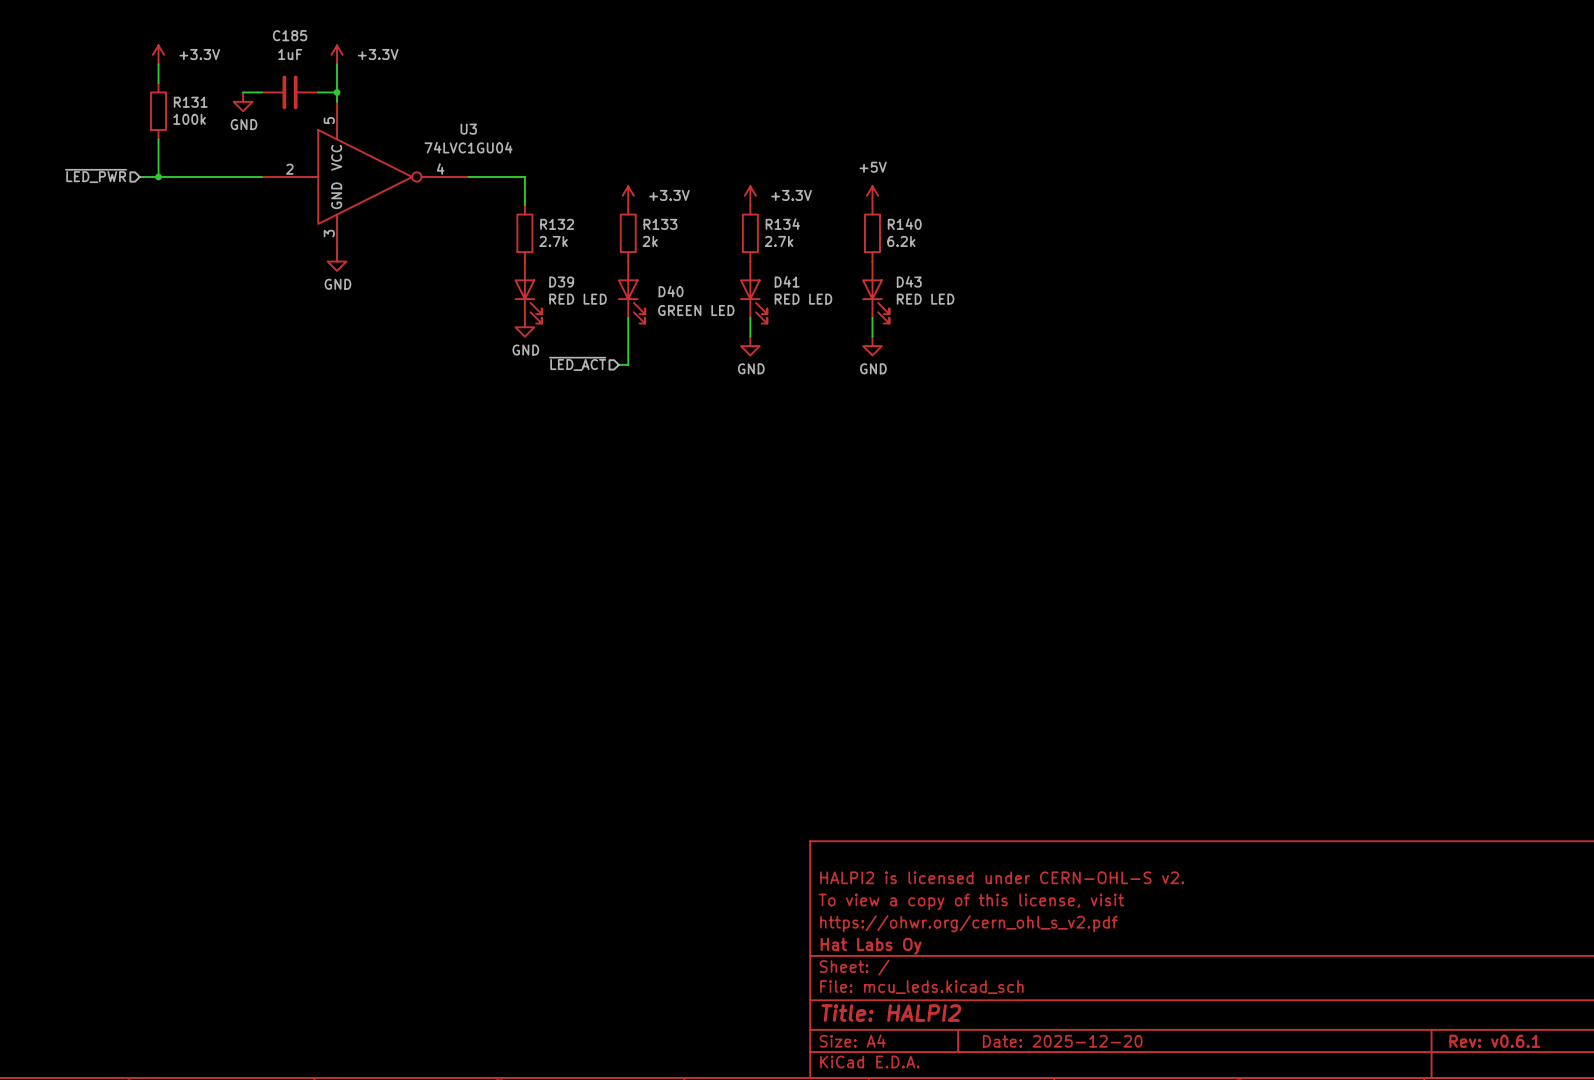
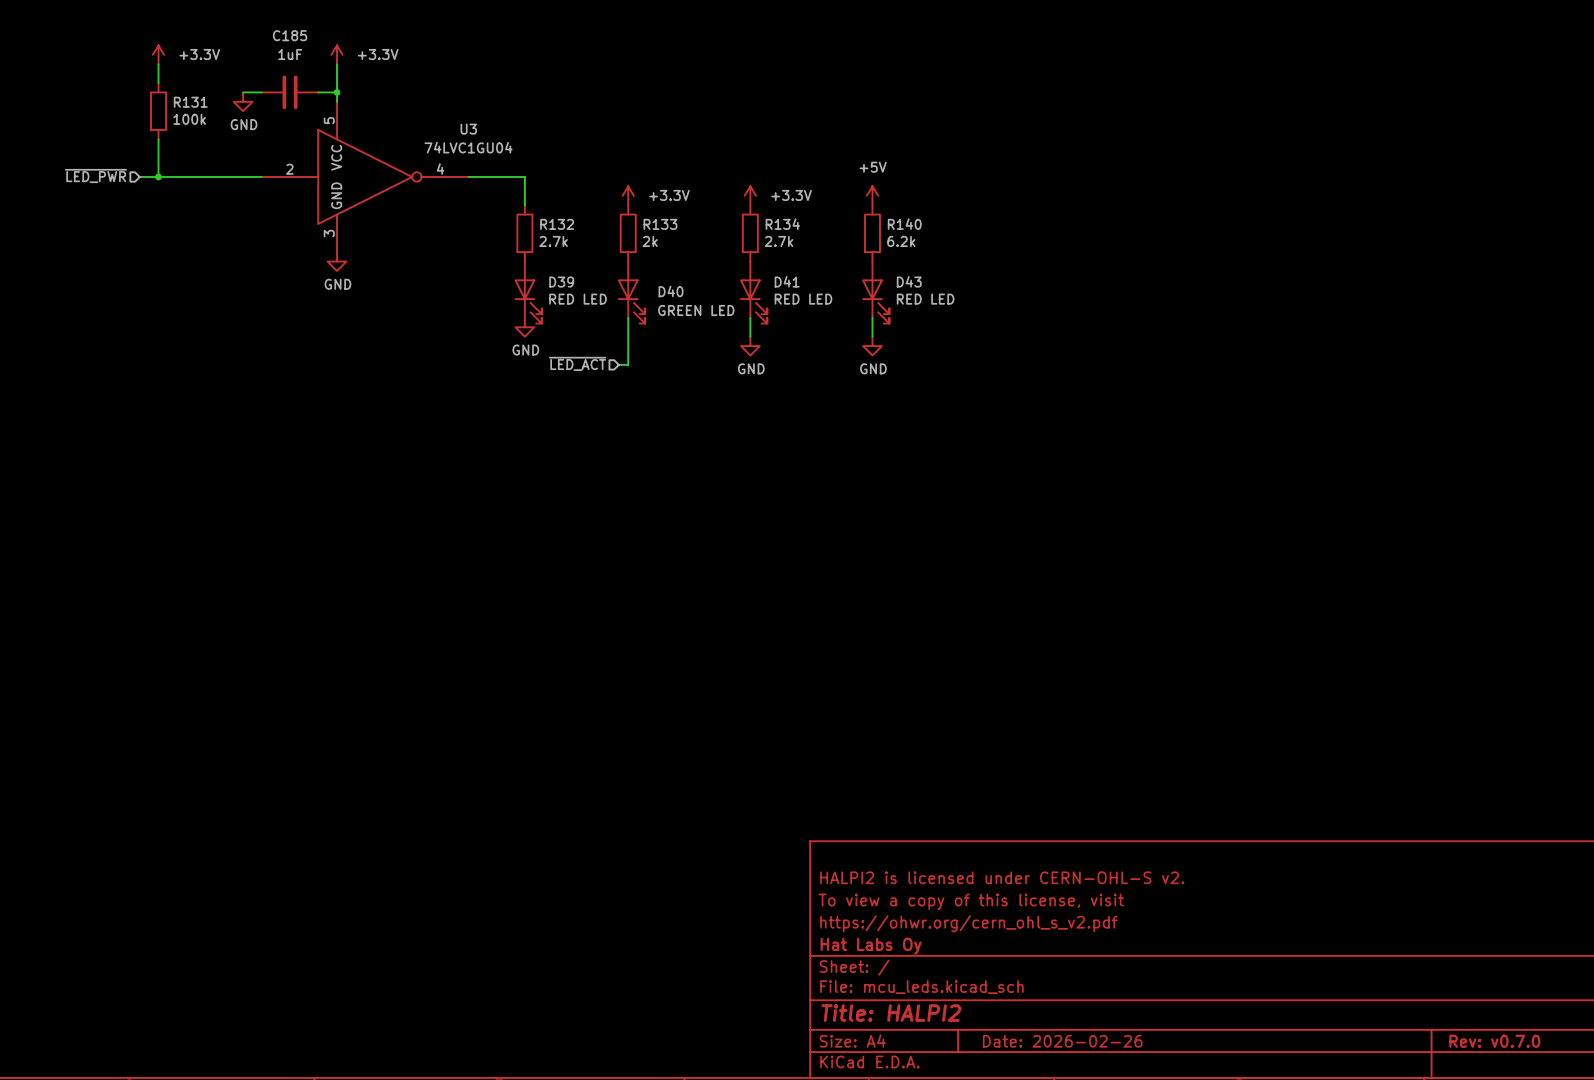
title block: Date: 2025-12-20 (1062, 1041) -> Date: 2026-02-26 (1062, 1041)
title block: Rev: v0.6.1 (1494, 1041) -> Rev: v0.7.0 (1494, 1041)

